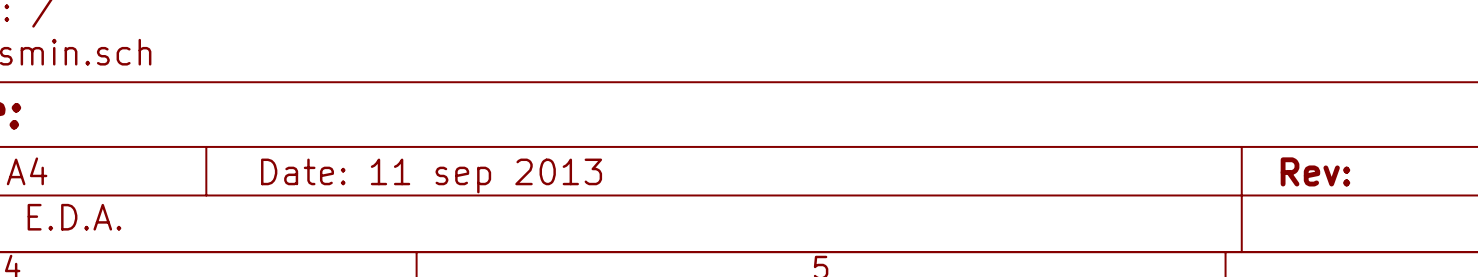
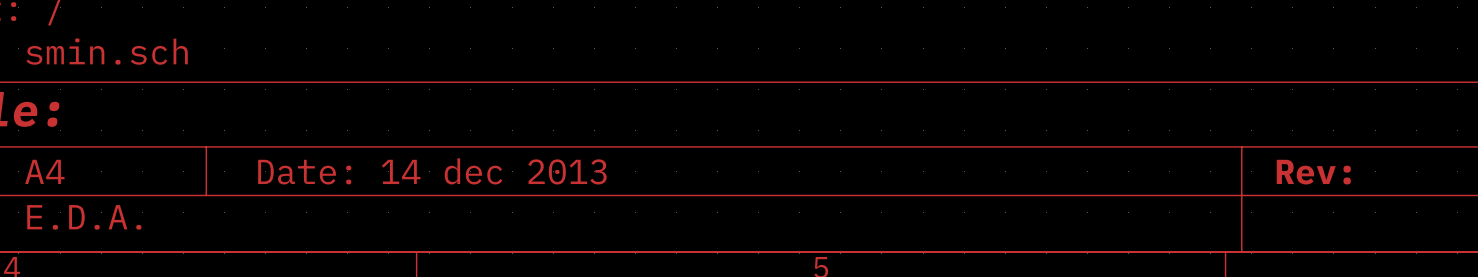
title block: Date: 11 sep 2013 (431, 175) -> Date: 14 dec 2013 (432, 171)

